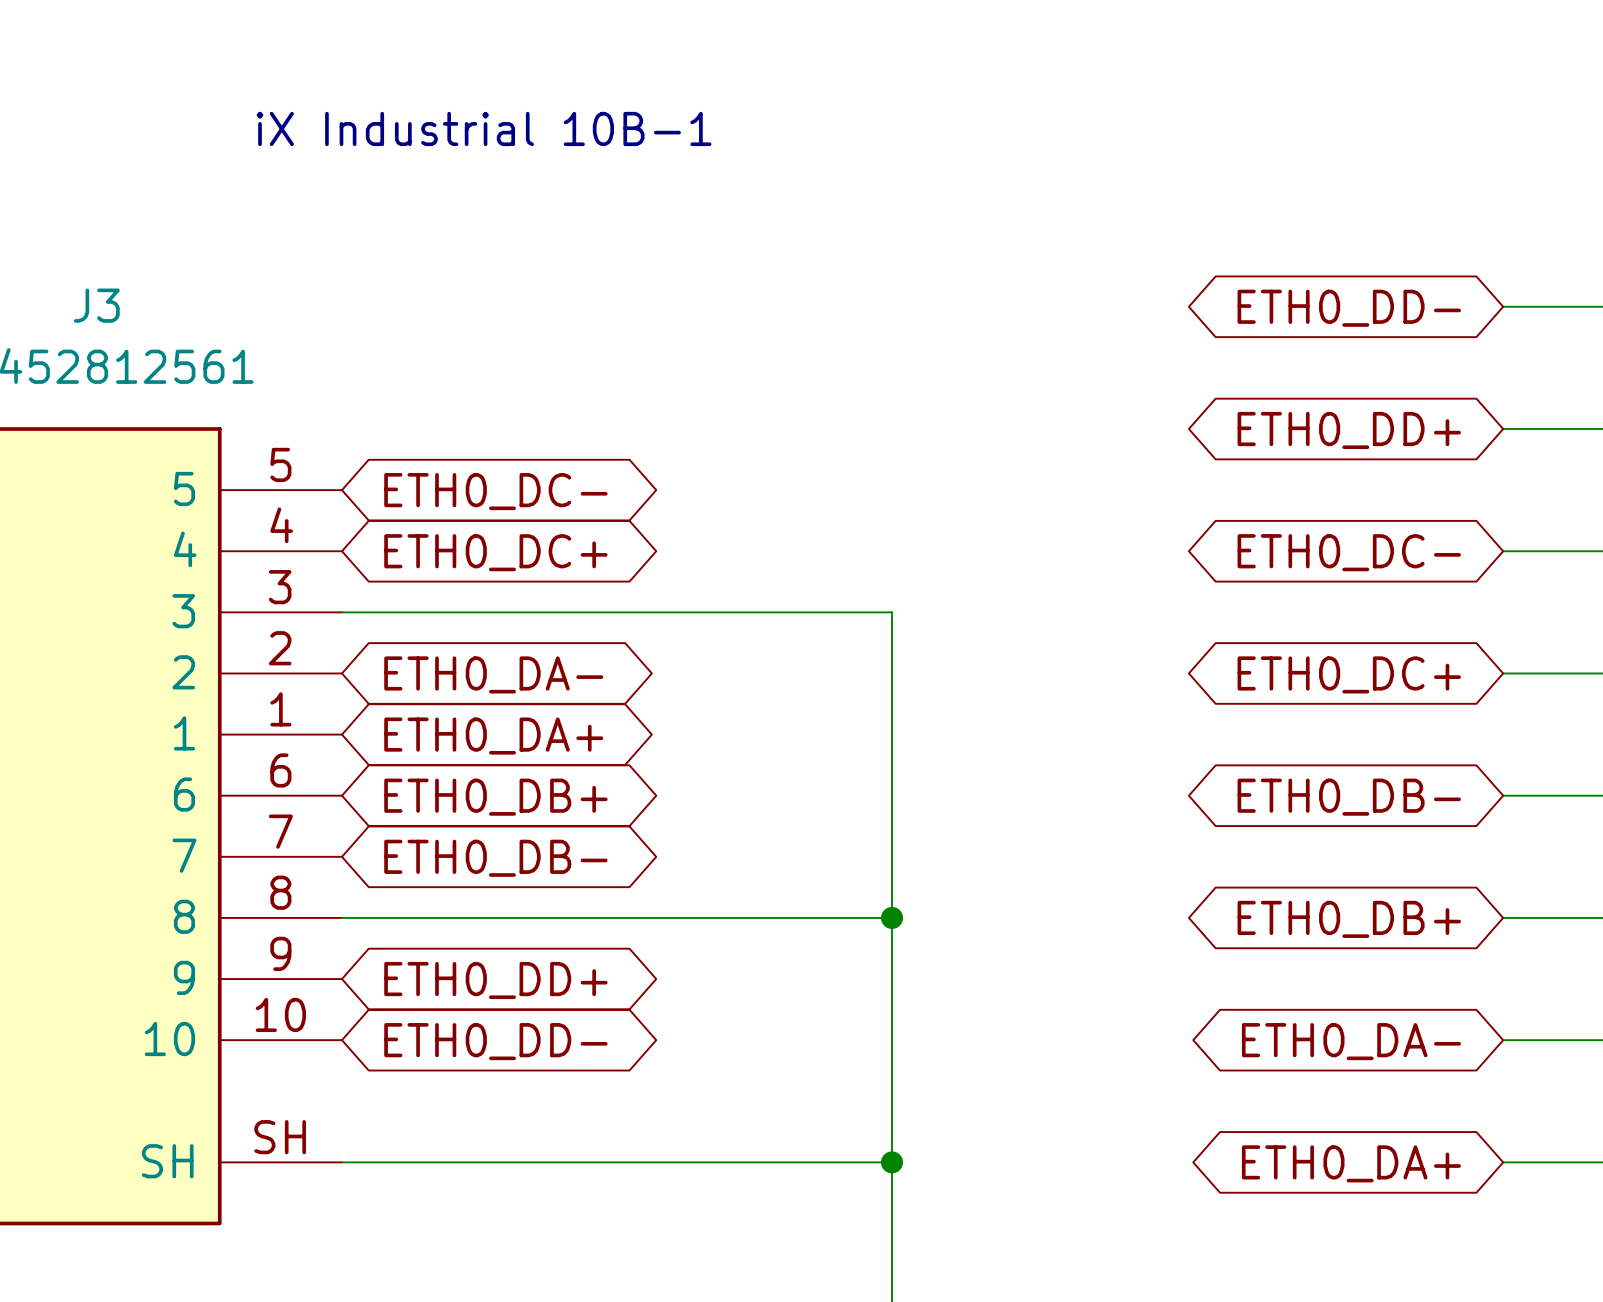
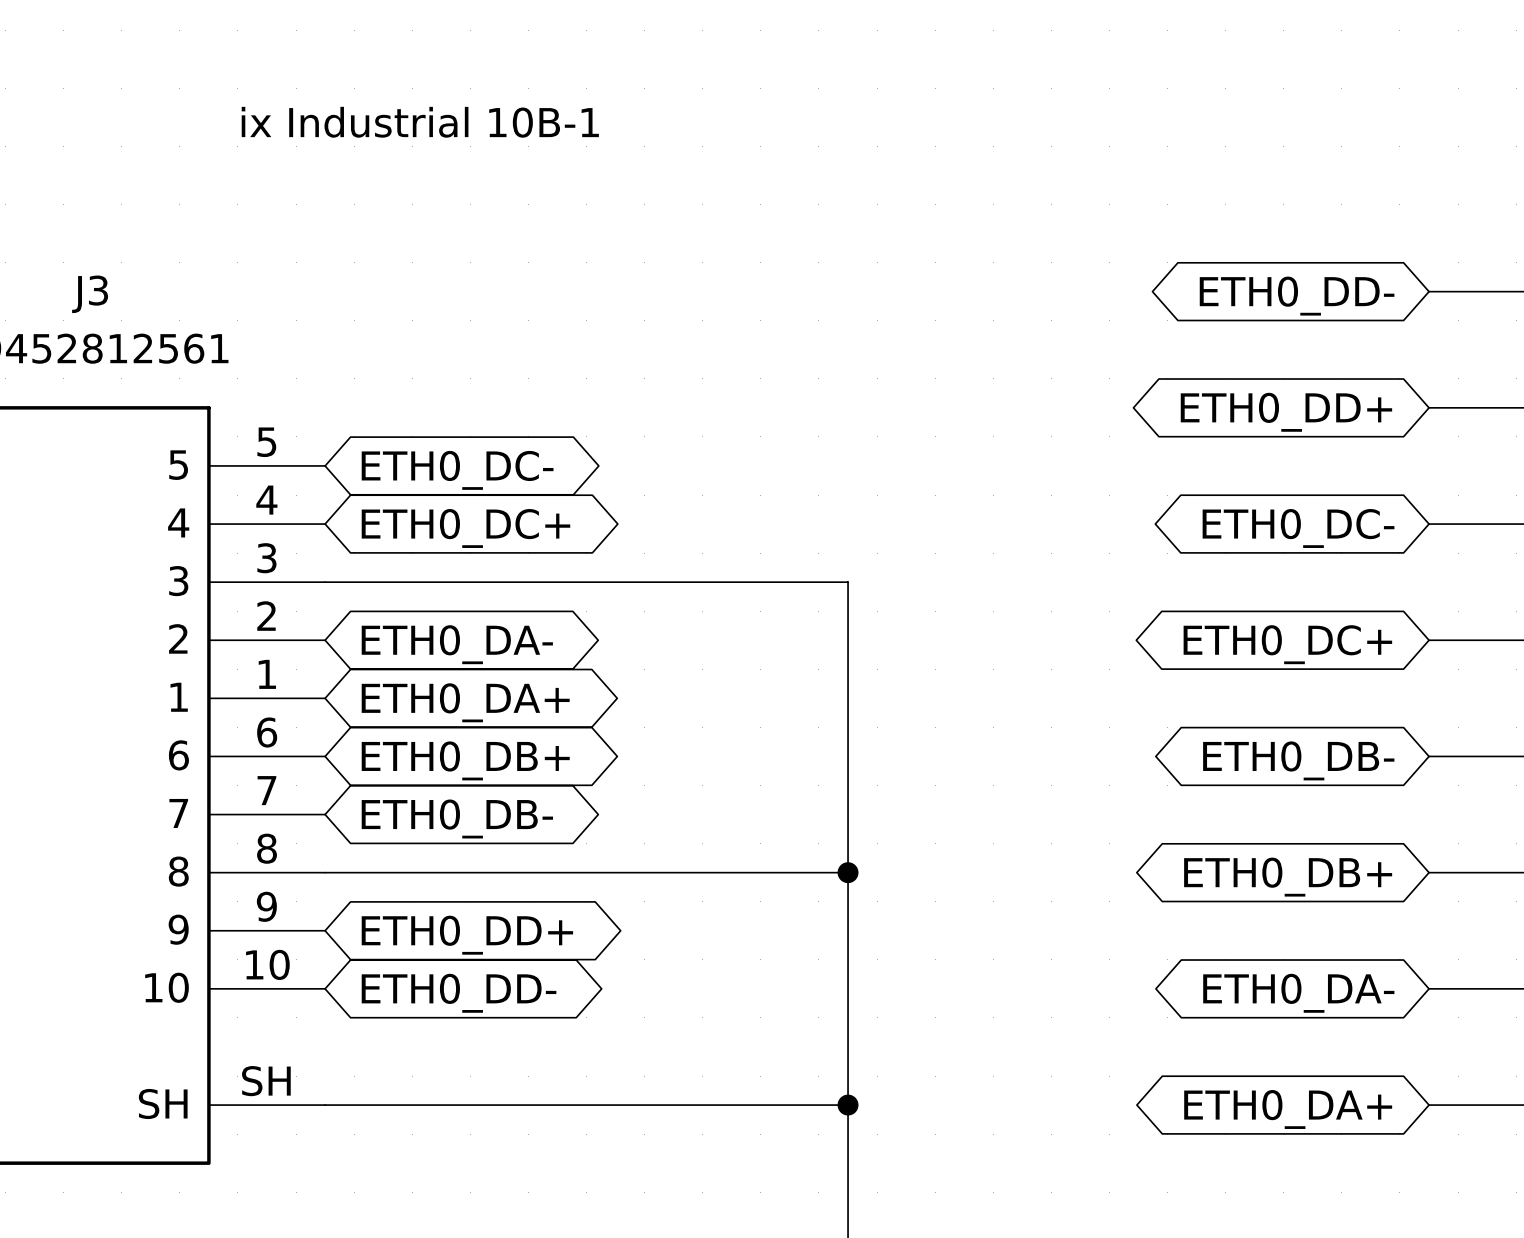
text: iX Industrial 10B-1 (484, 128) -> ix Industrial 10B-1 (420, 122)

